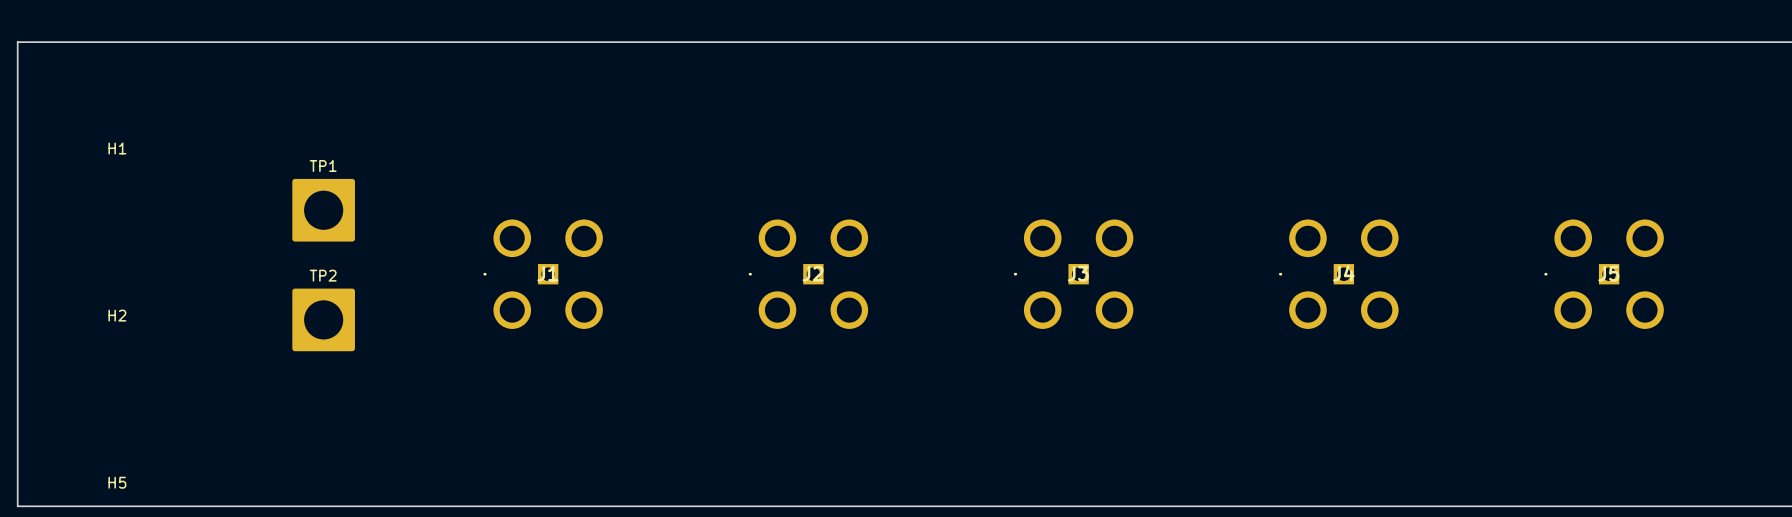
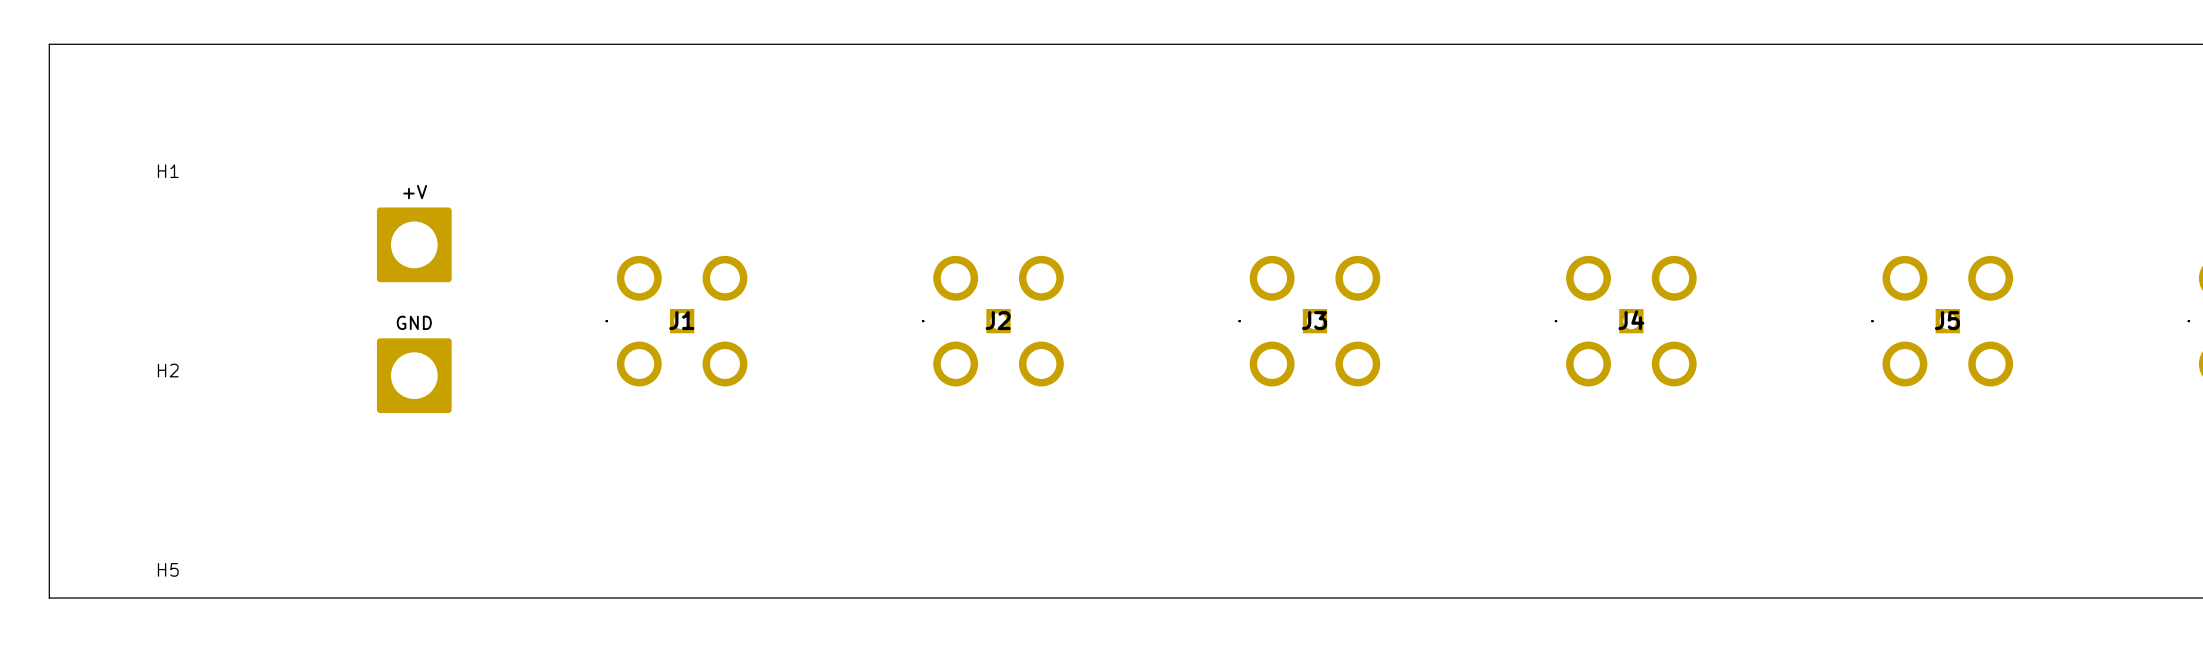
TP1 name: TP1 (323, 166) -> +V (415, 192)
TP2 name: TP2 (323, 275) -> GND (414, 322)

